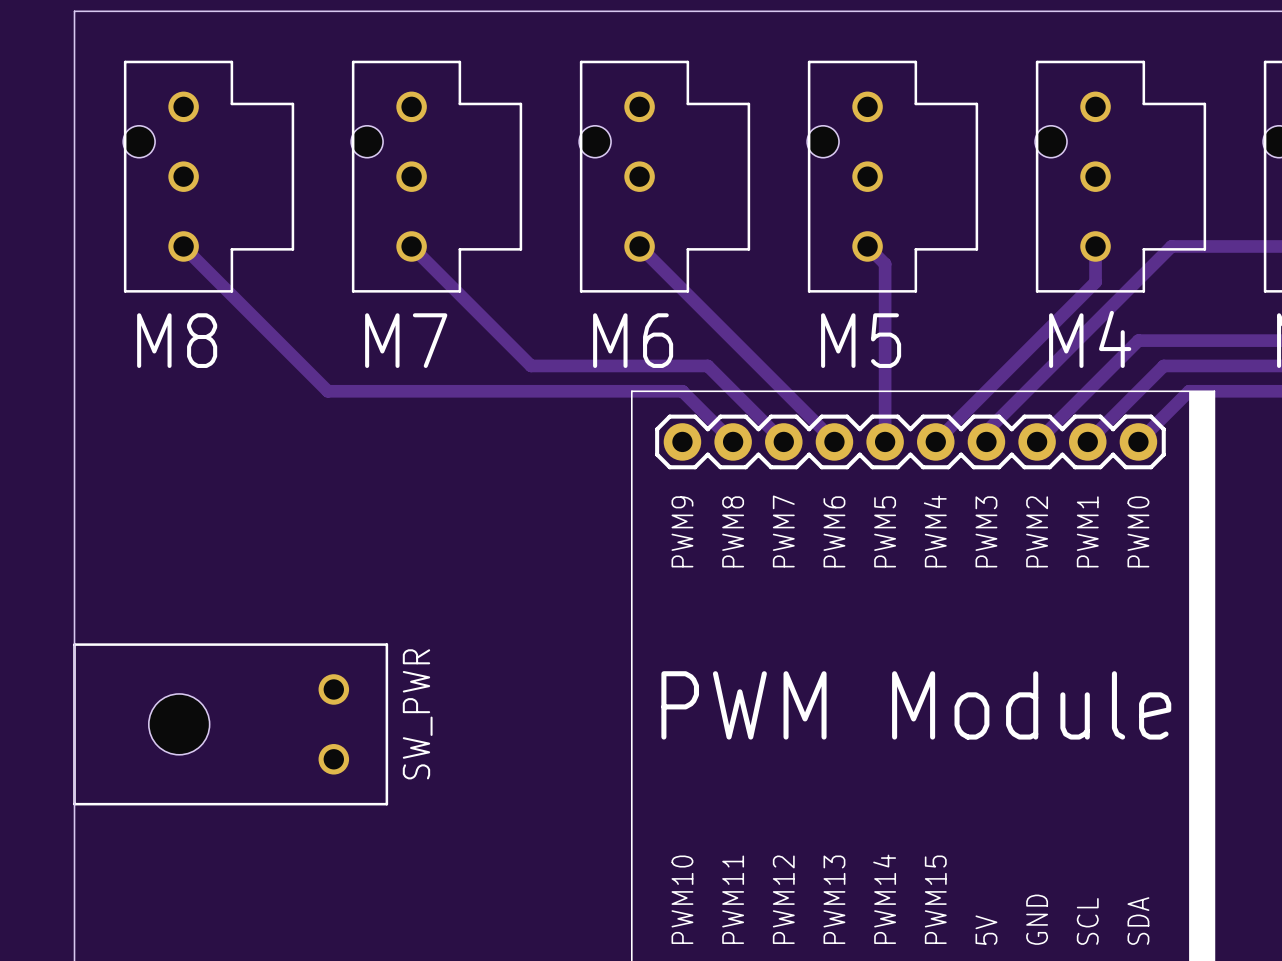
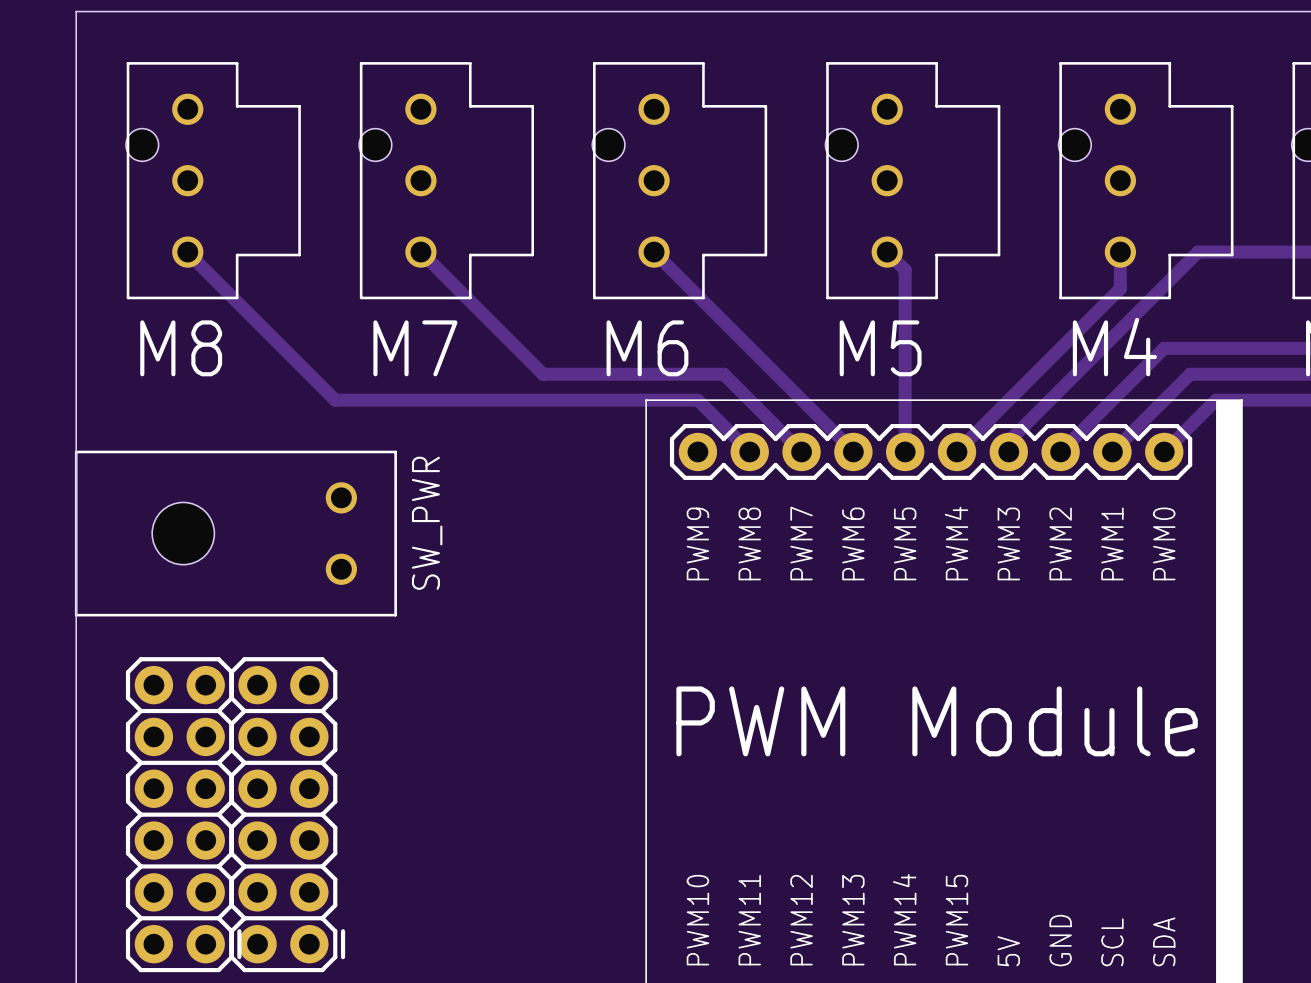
SW_PWR position: (230, 724) -> (235, 533)
part: none -> (183, 814)
part: none -> (287, 814)

